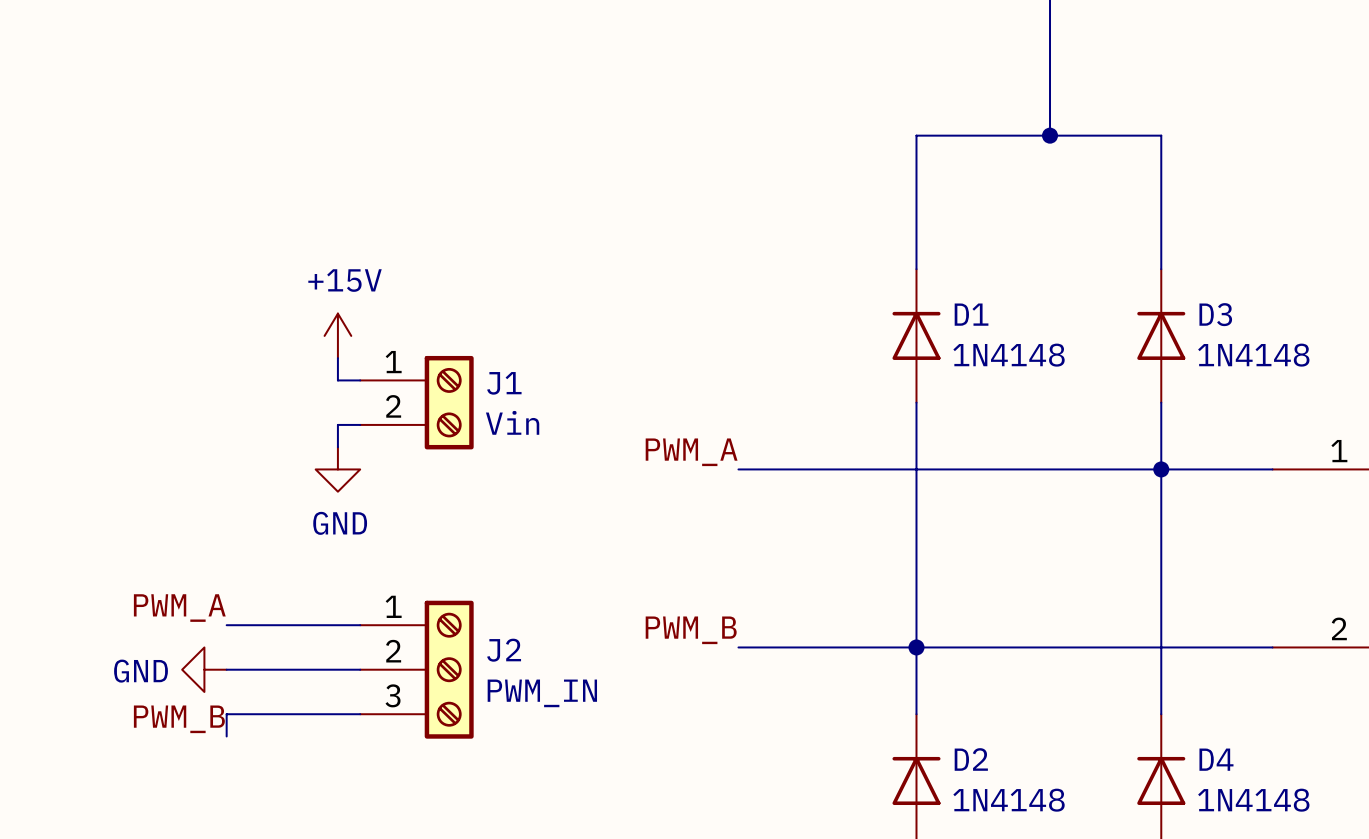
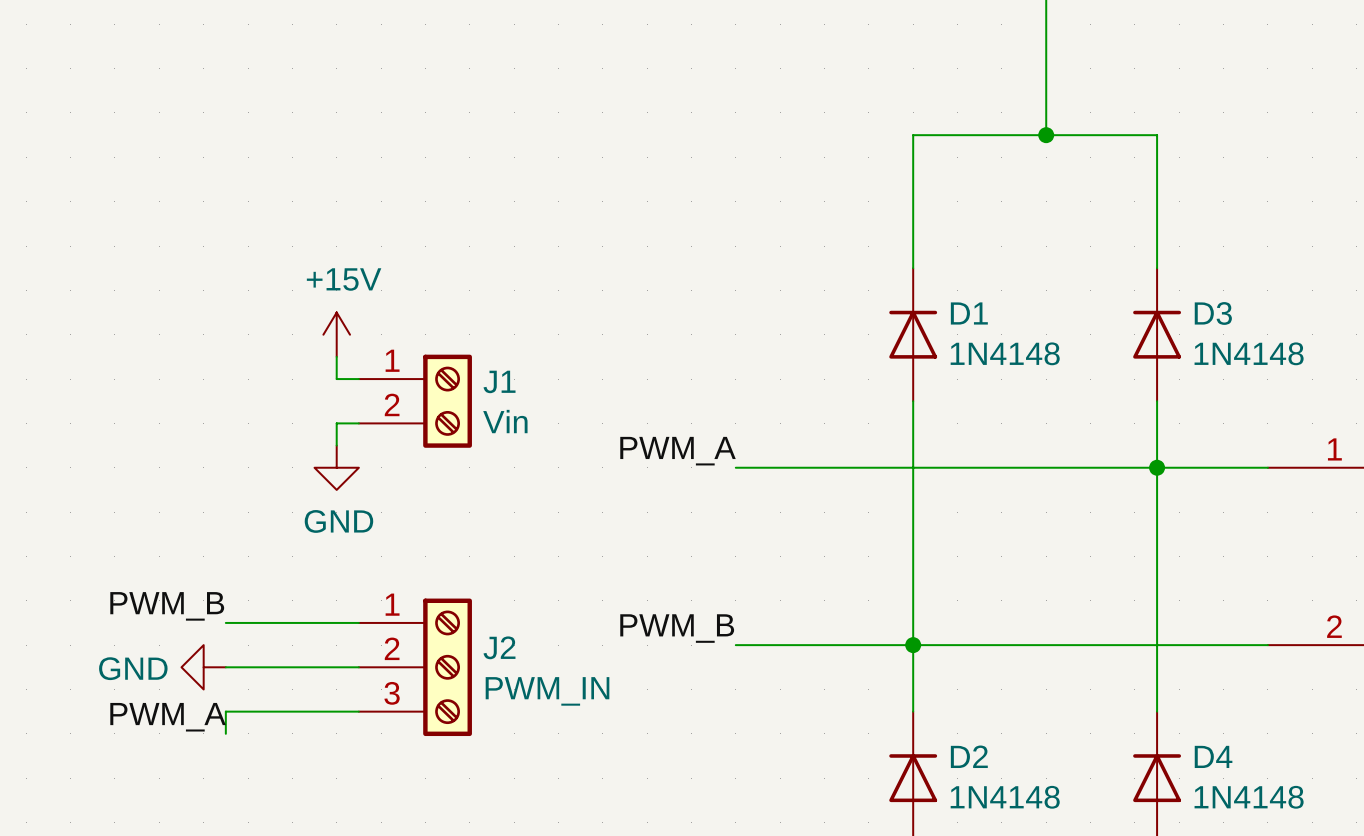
label: PWM_A (179, 608) -> PWM_B (167, 606)
label: PWM_B (179, 719) -> PWM_A (168, 717)

